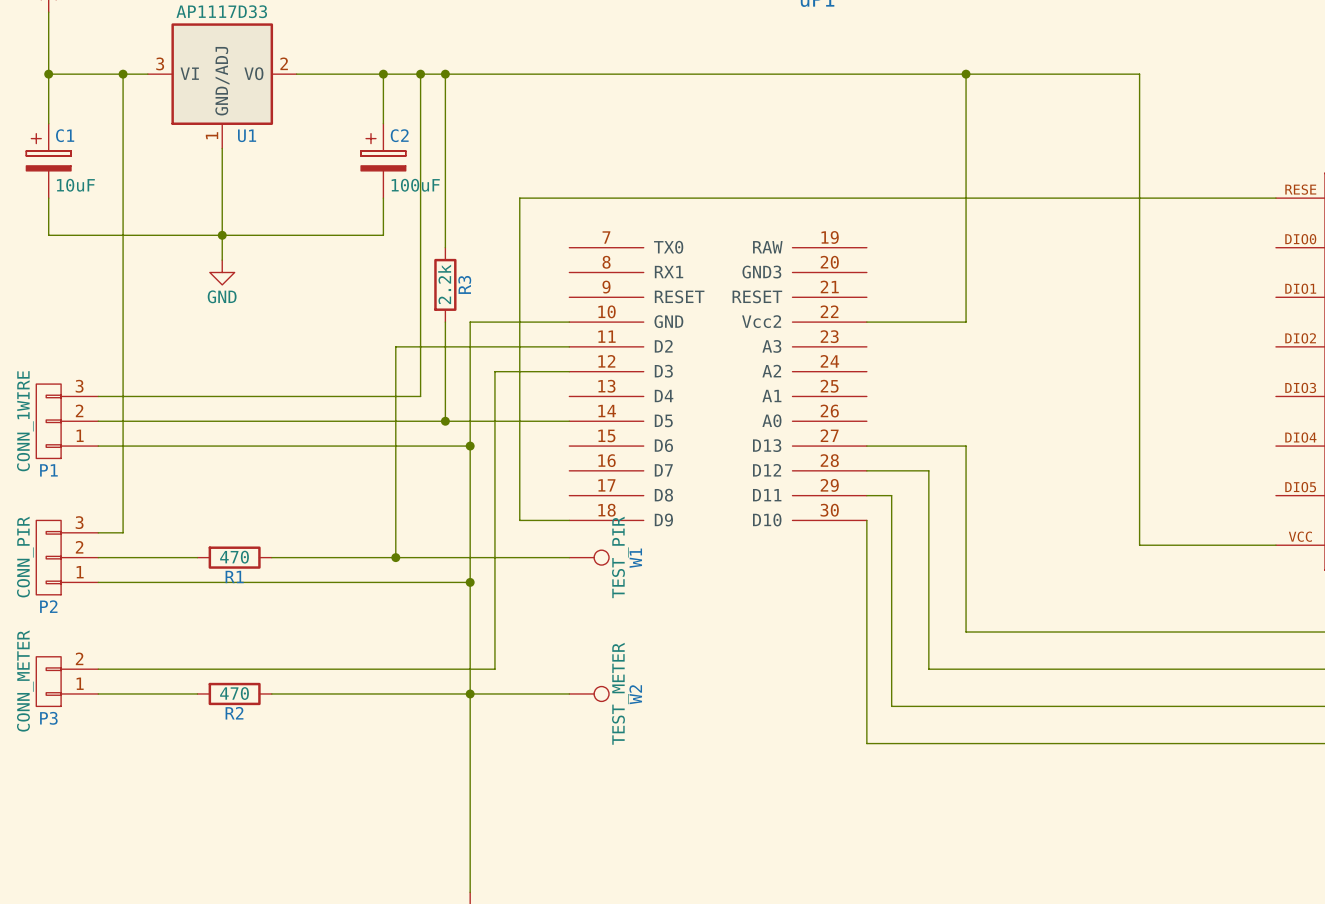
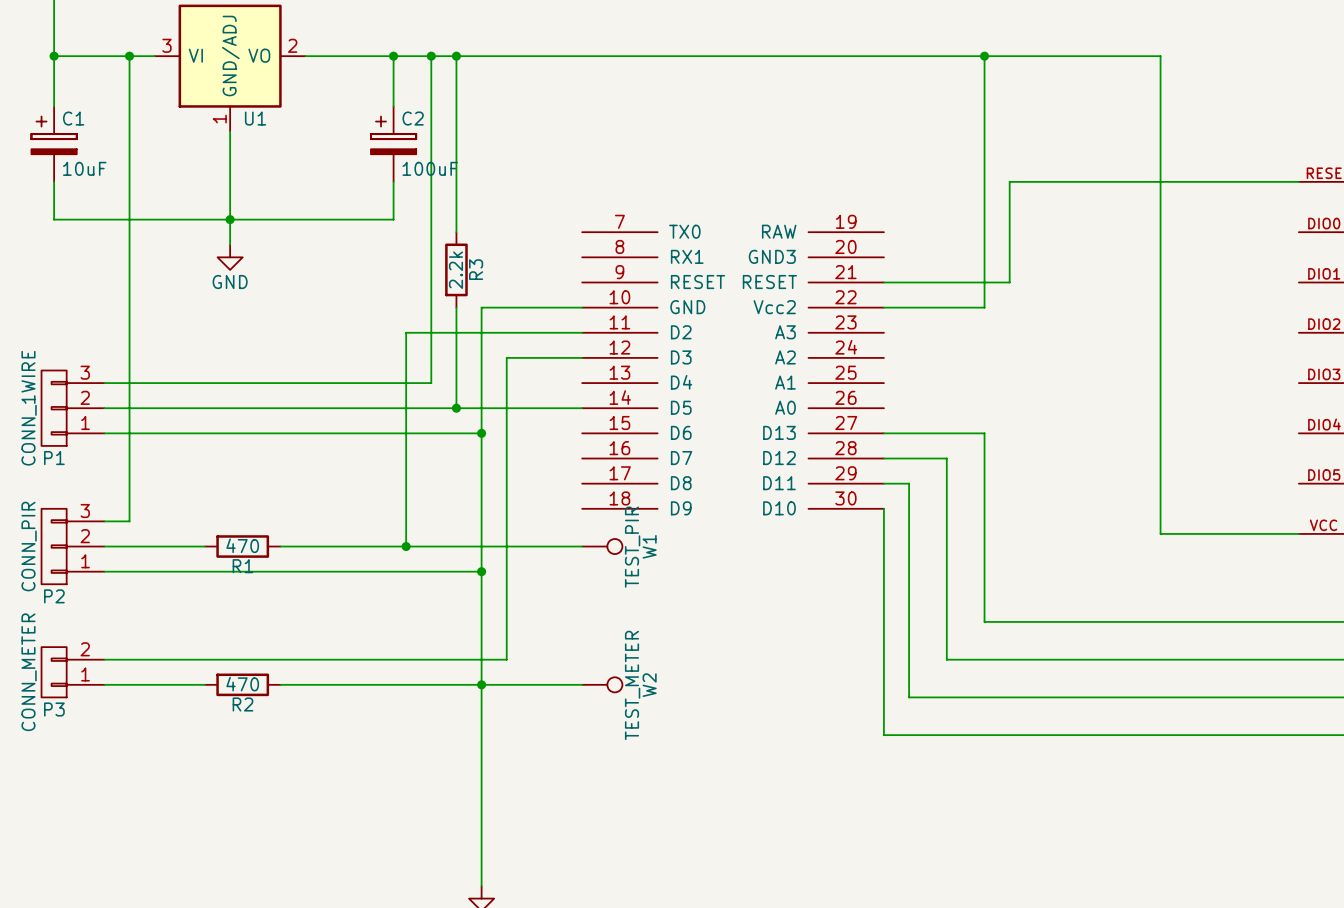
wire: (990, 198) (519, 198) (519, 520) (569, 520) -> (1009, 181) (1009, 282) (883, 282)

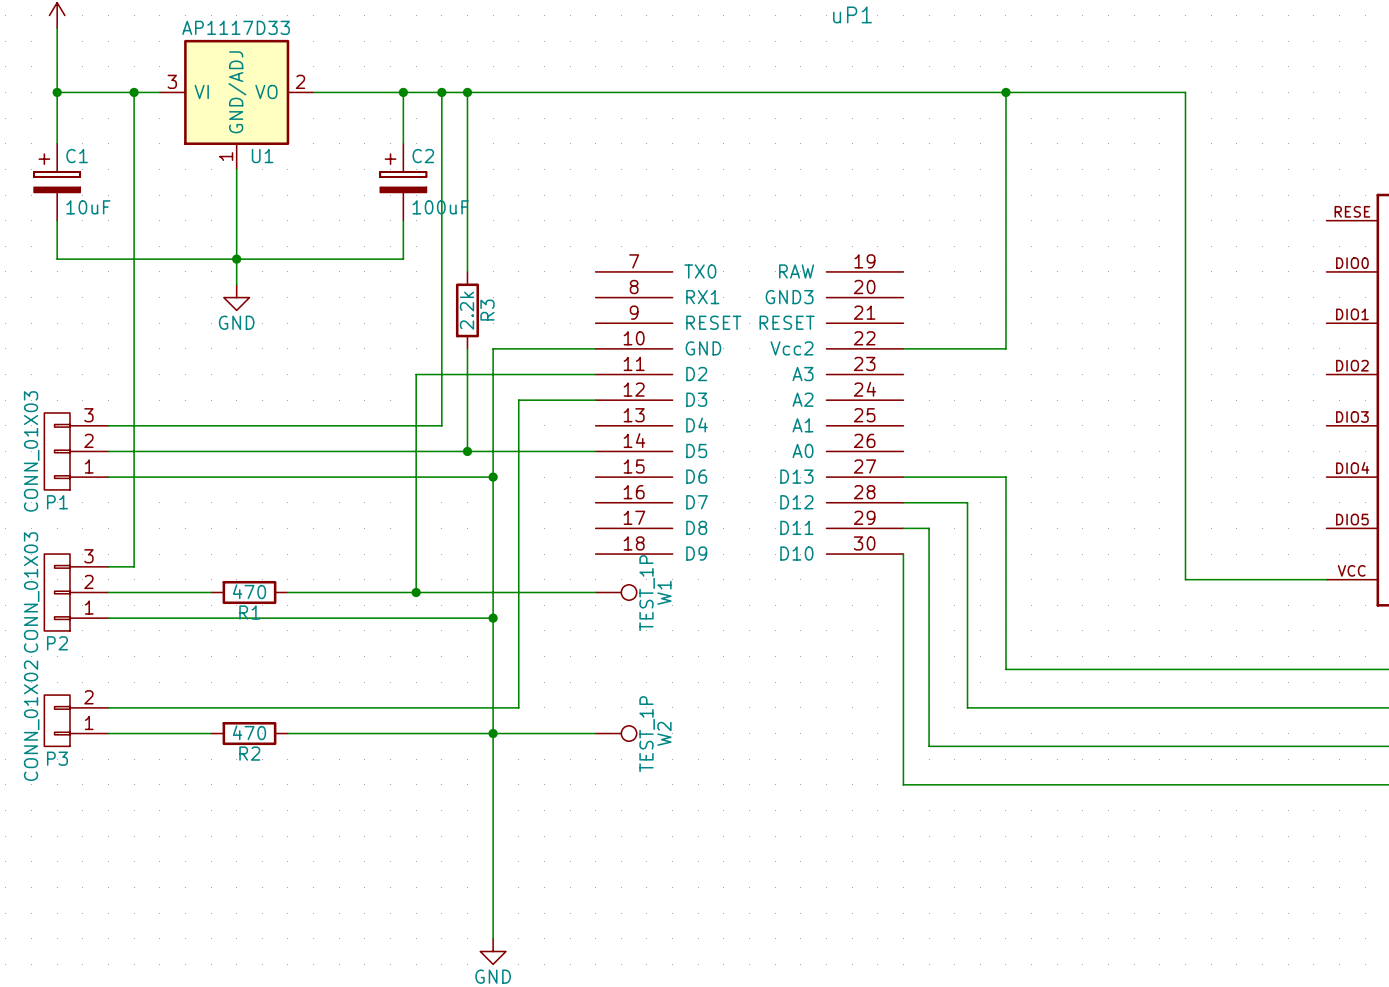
wire: (1298, 181) (1009, 181) (1009, 282) (883, 282) -> none
P1 value: CONN_1WIRE (29, 408) -> CONN_01X03 (31, 451)
P2 value: CONN_PIR (29, 546) -> CONN_01X03 (31, 592)
W1 value: TEST_PIR (632, 547) -> TEST_1P (647, 593)
P3 value: CONN_METER (29, 672) -> CONN_01X02 (31, 720)
W2 value: TEST_METER (632, 685) -> TEST_1P (647, 734)

